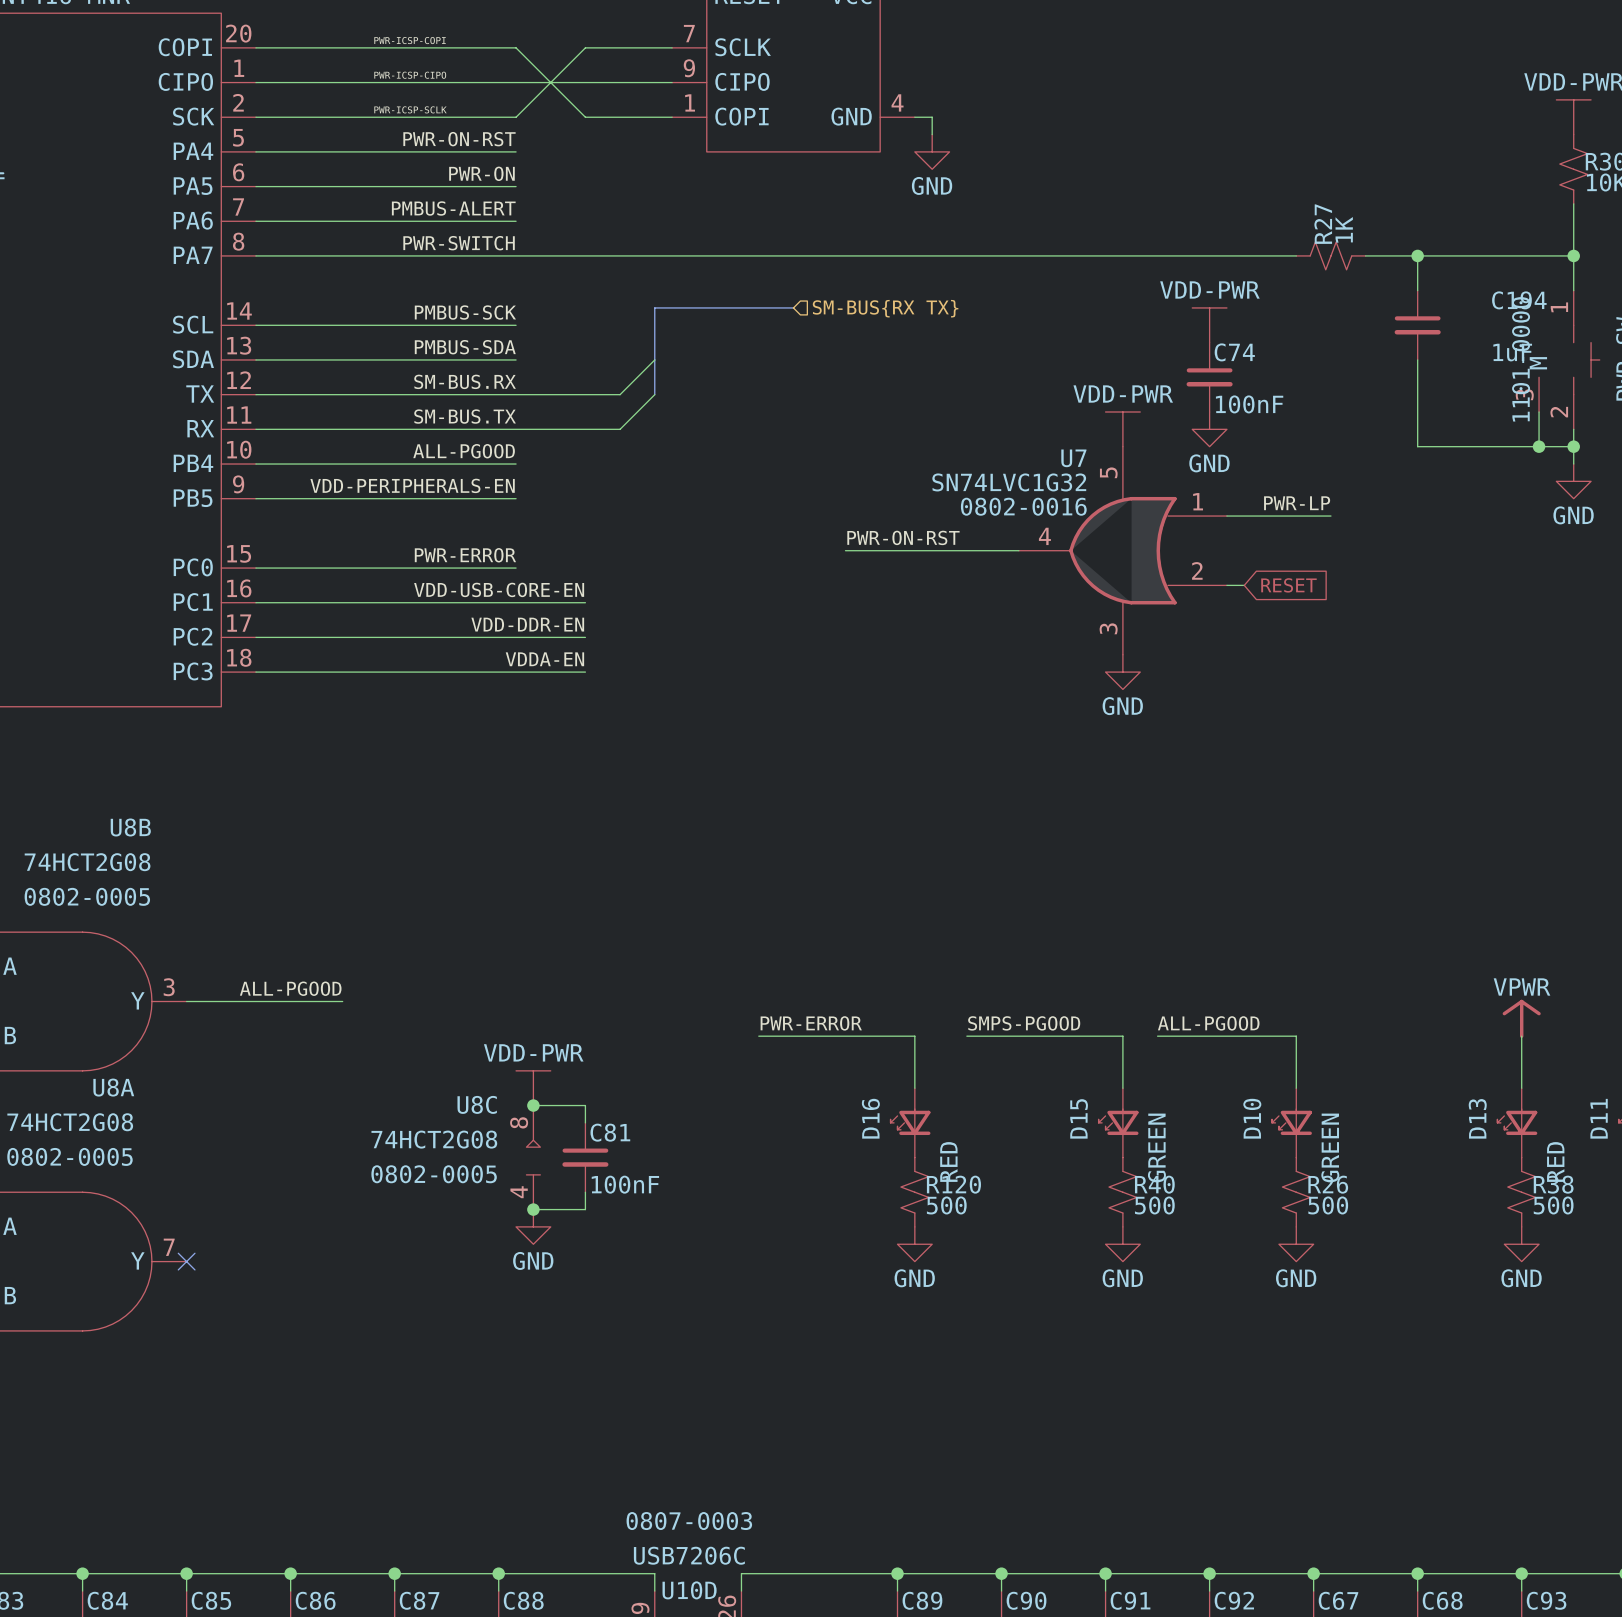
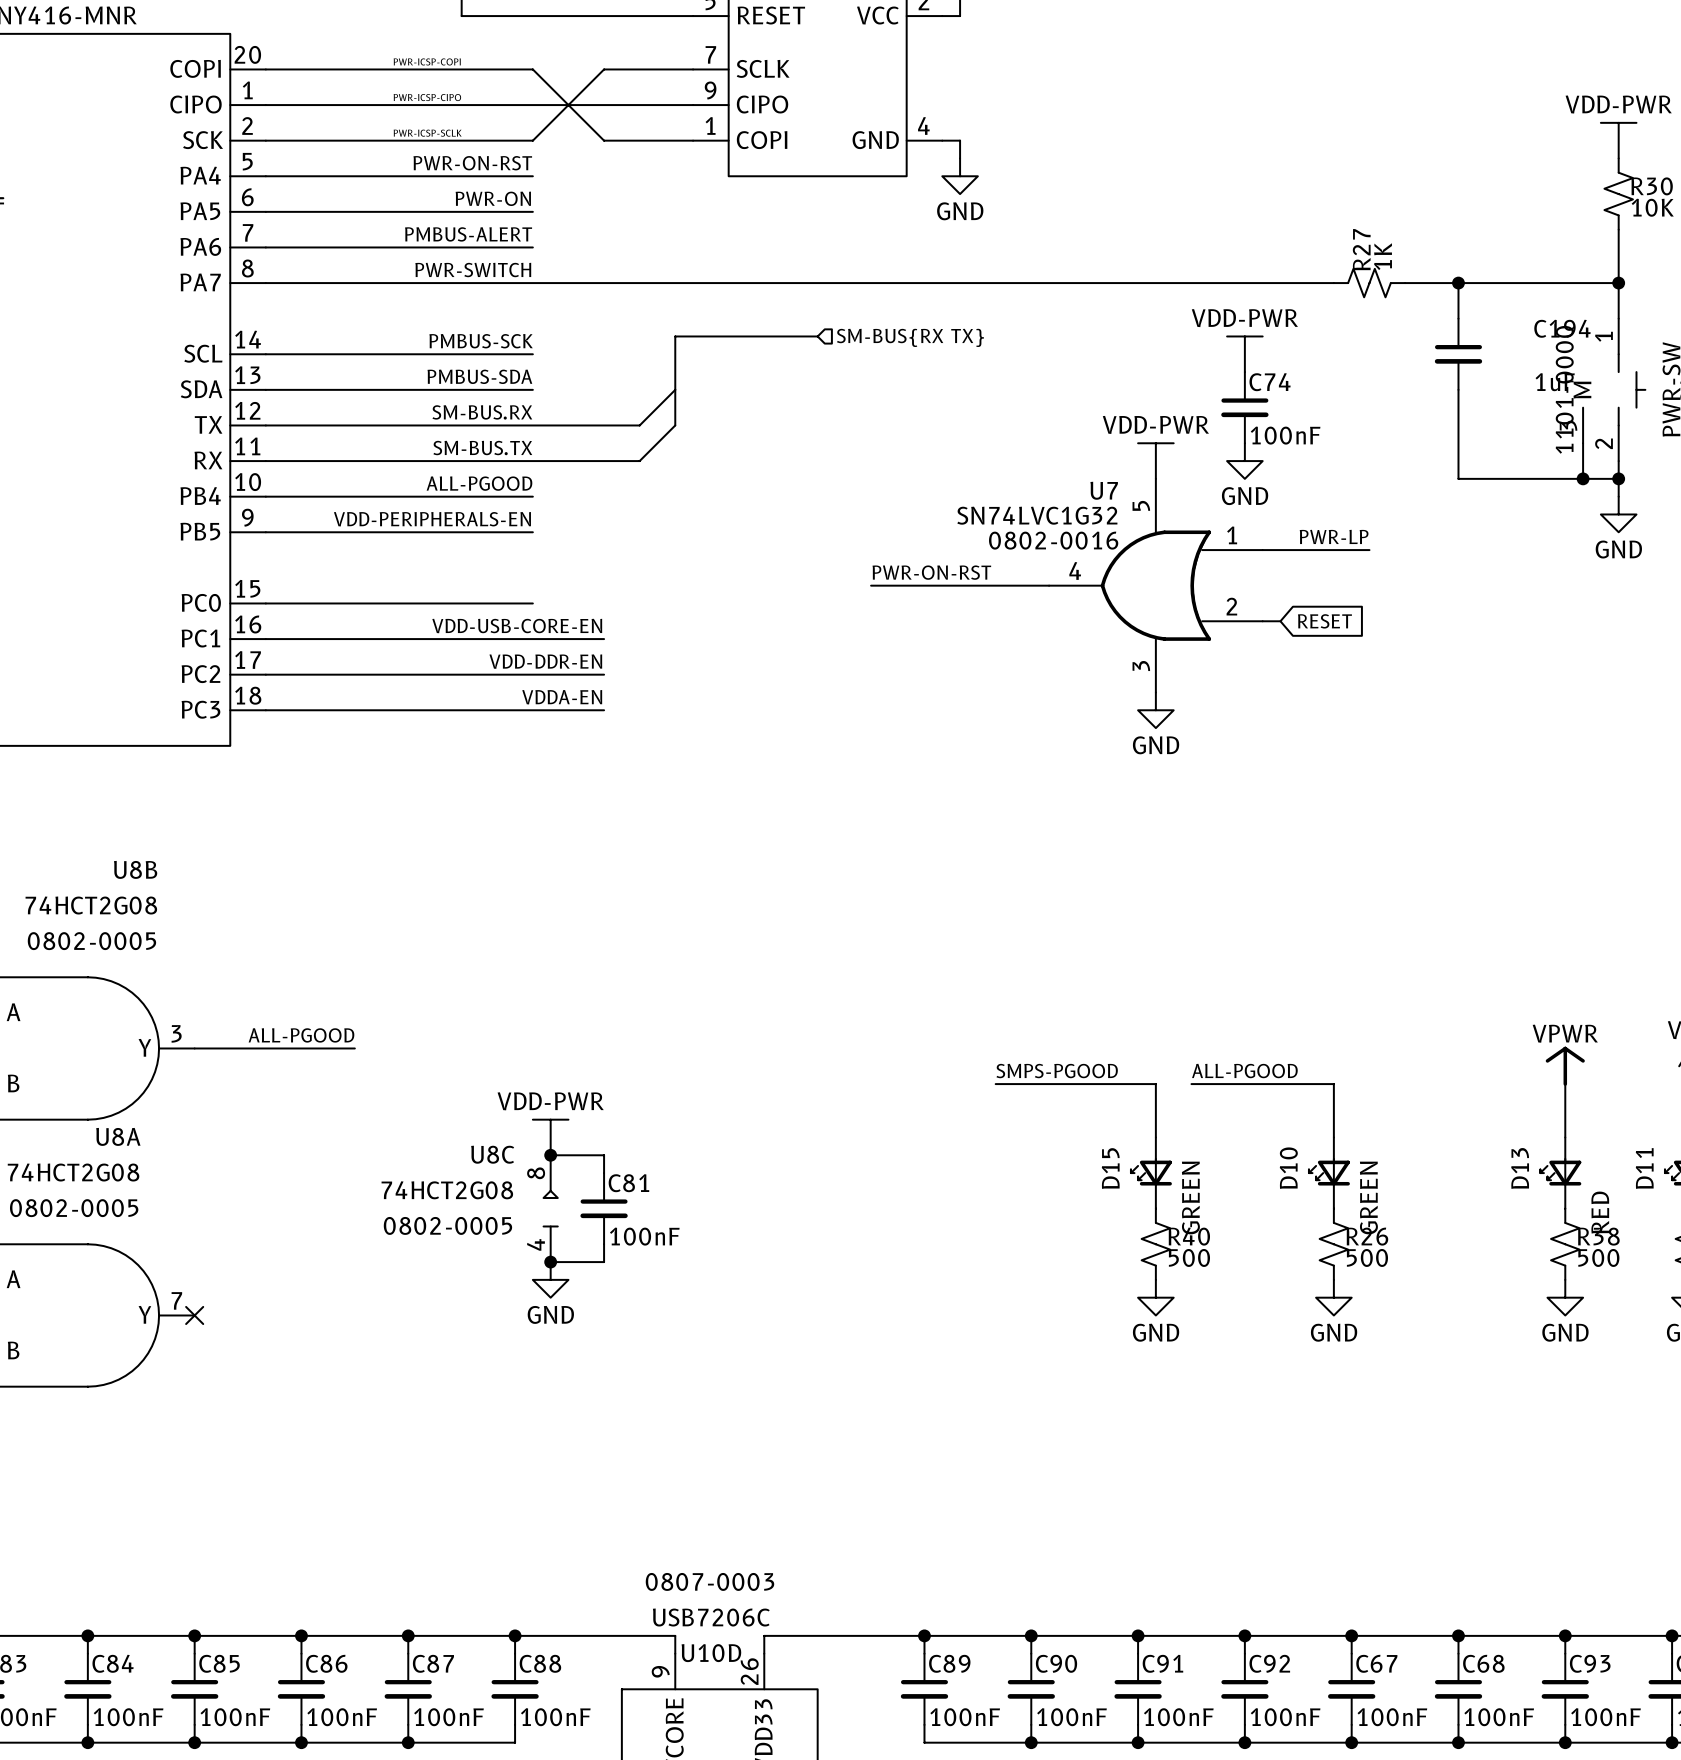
label: PWR-ERROR (465, 555) -> none
label: PWR-ERROR (811, 1023) -> none
wire: (758, 1036) (914, 1036) (914, 1088) -> none
D16: RED (910, 1122) -> none
R120: 500 (914, 1192) -> none
power symbol: GND (914, 1244) -> none

